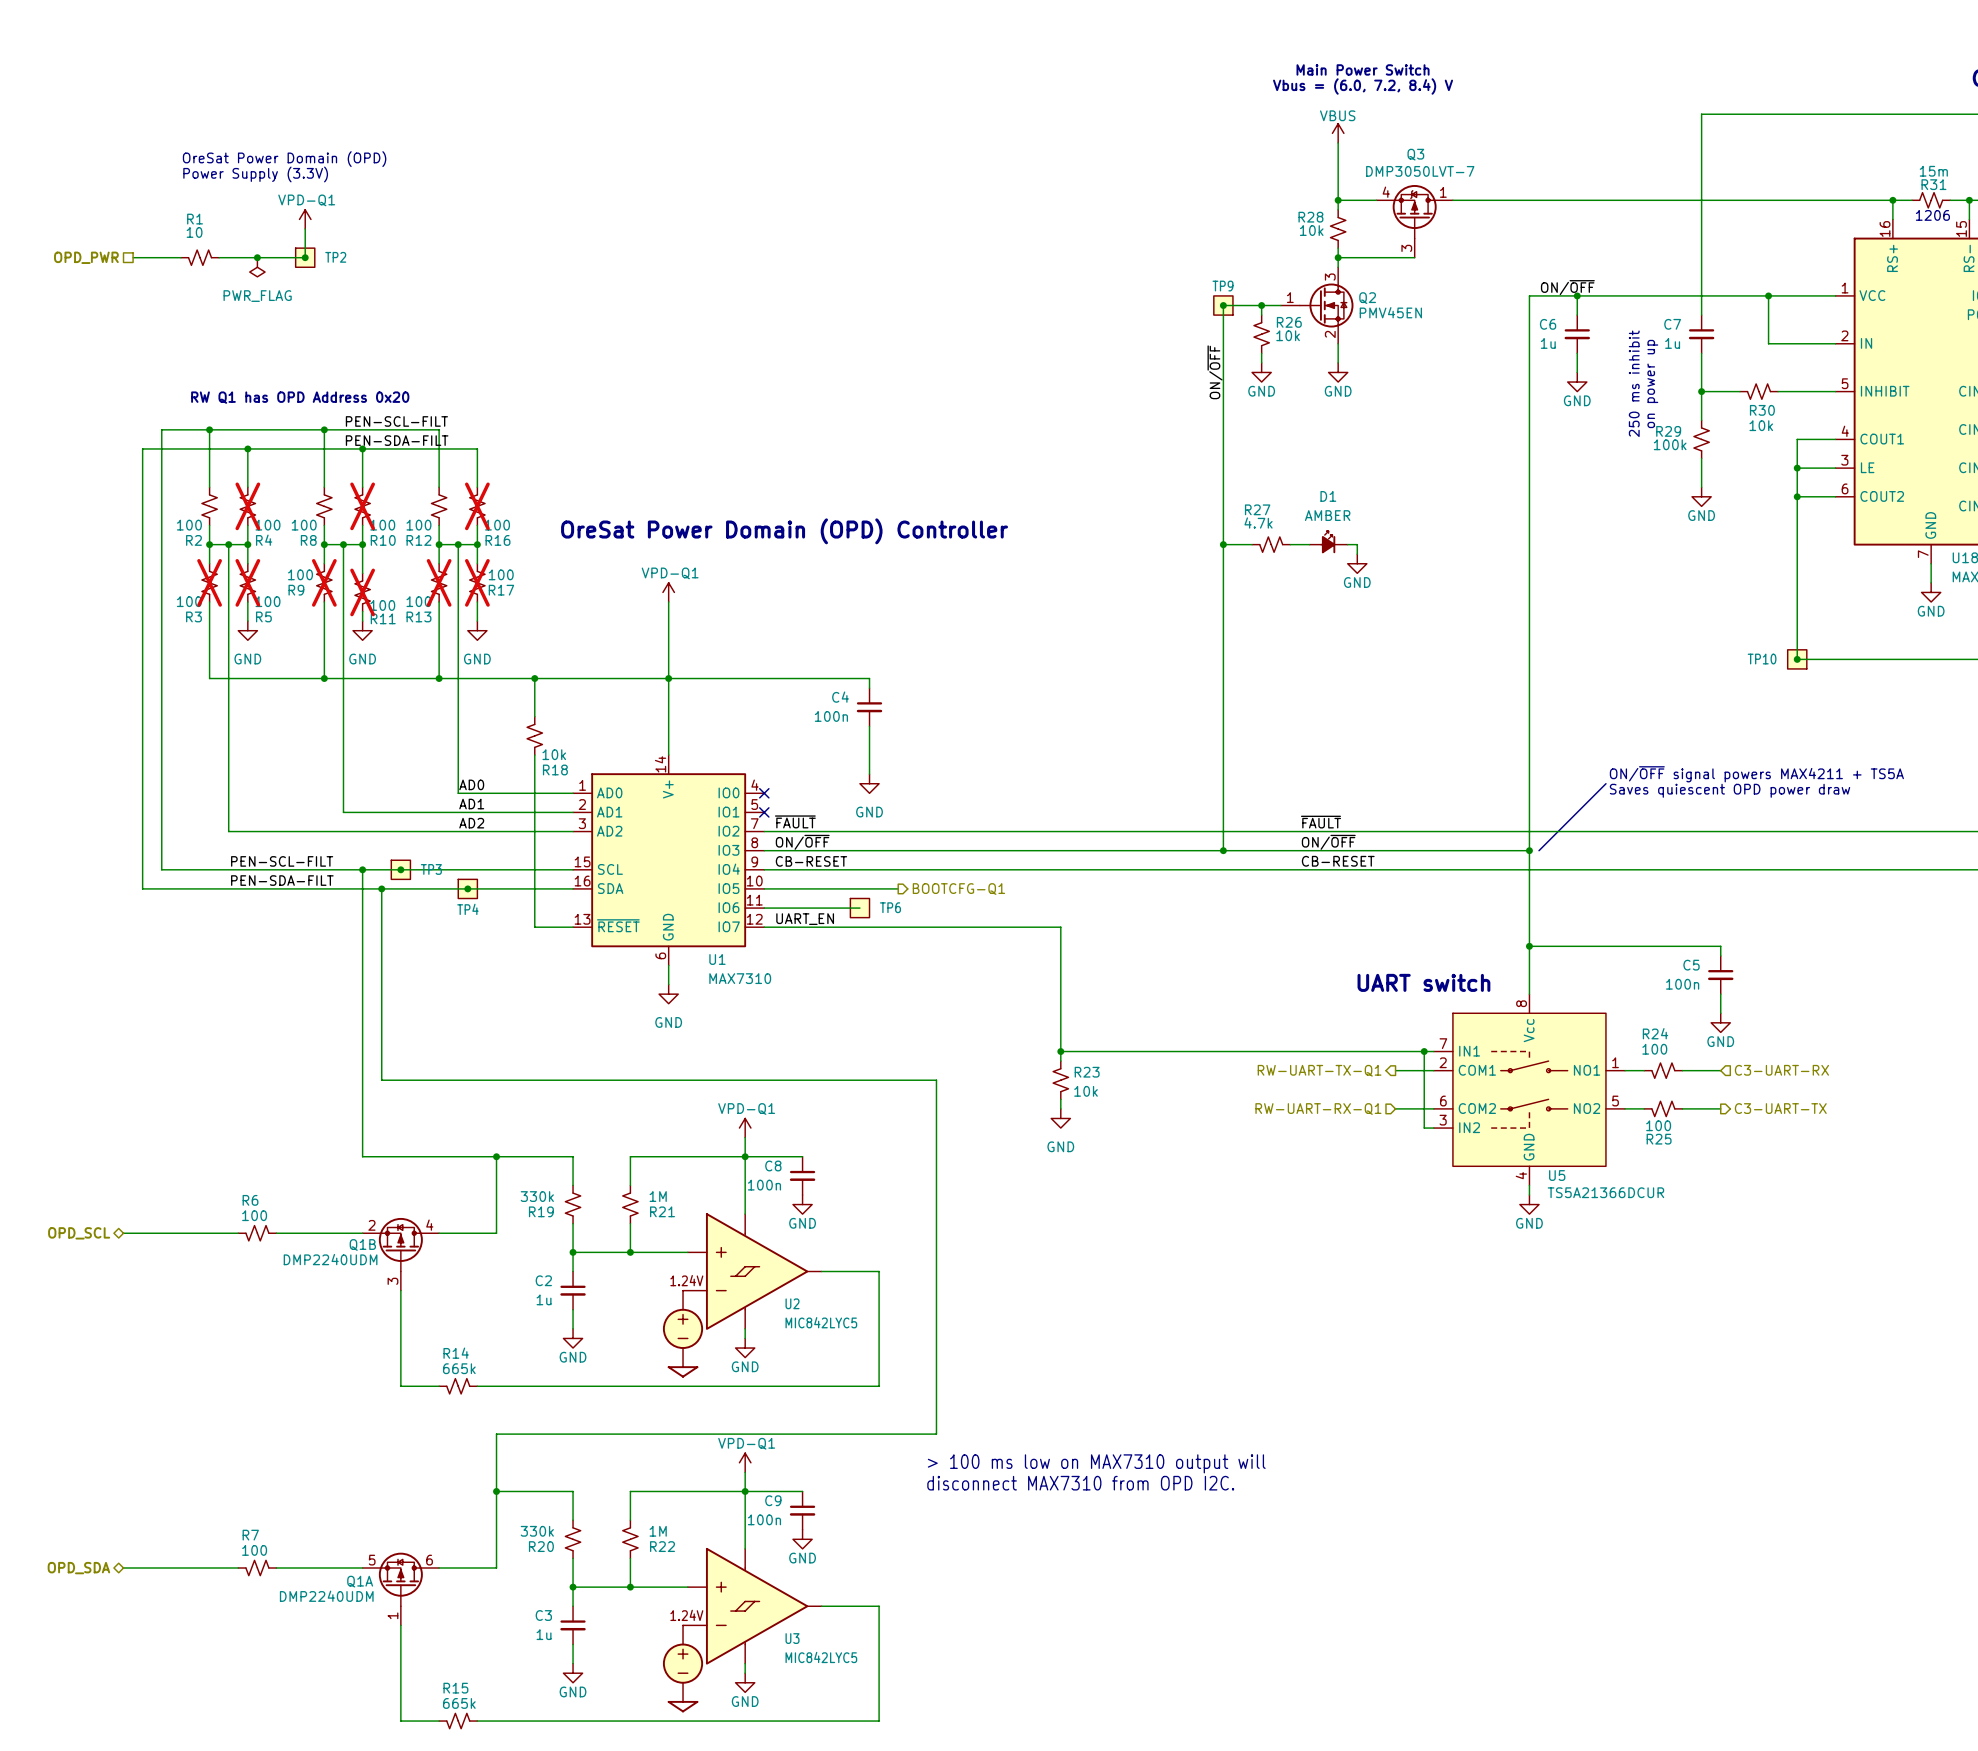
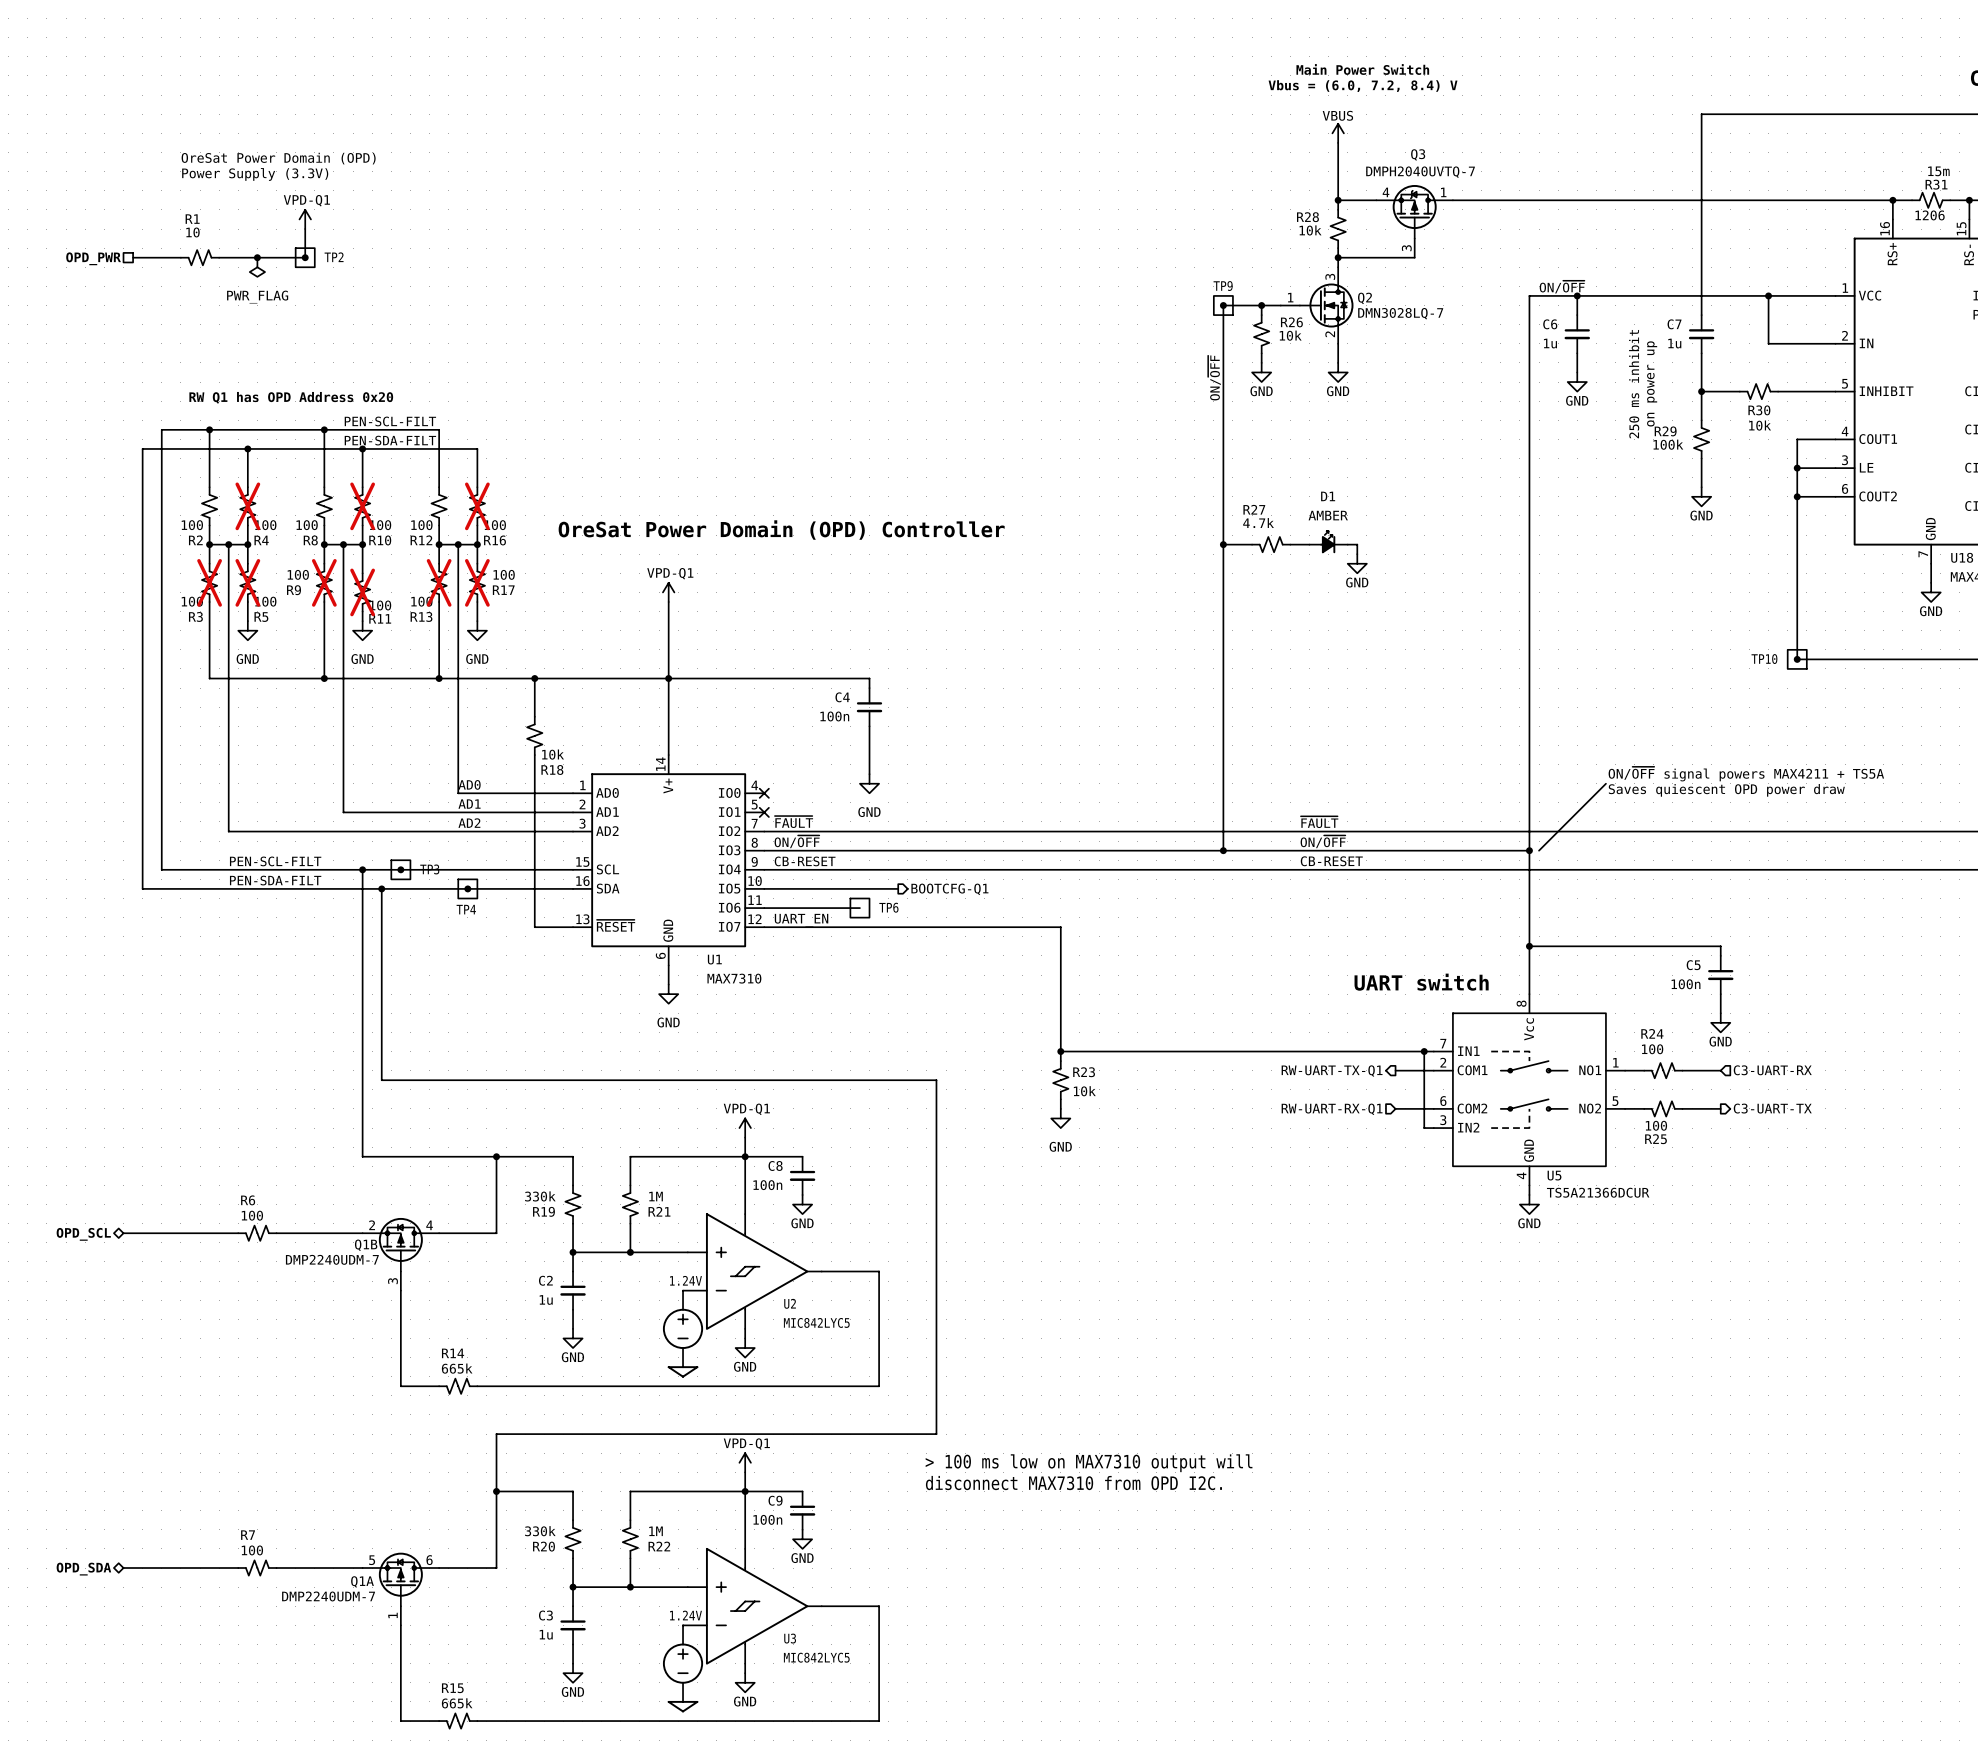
Q3 value: DMP3050LVT-7 (1420, 171) -> DMPH2040UVTQ-7 (1420, 172)
Q2 value: PMV45EN (1390, 312) -> DMN3028LQ-7 (1400, 313)
Q1B value: DMP2240UDM (330, 1259) -> DMP2240UDM-7 (332, 1259)
Q1A value: DMP2240UDM (326, 1596) -> DMP2240UDM-7 (328, 1596)

